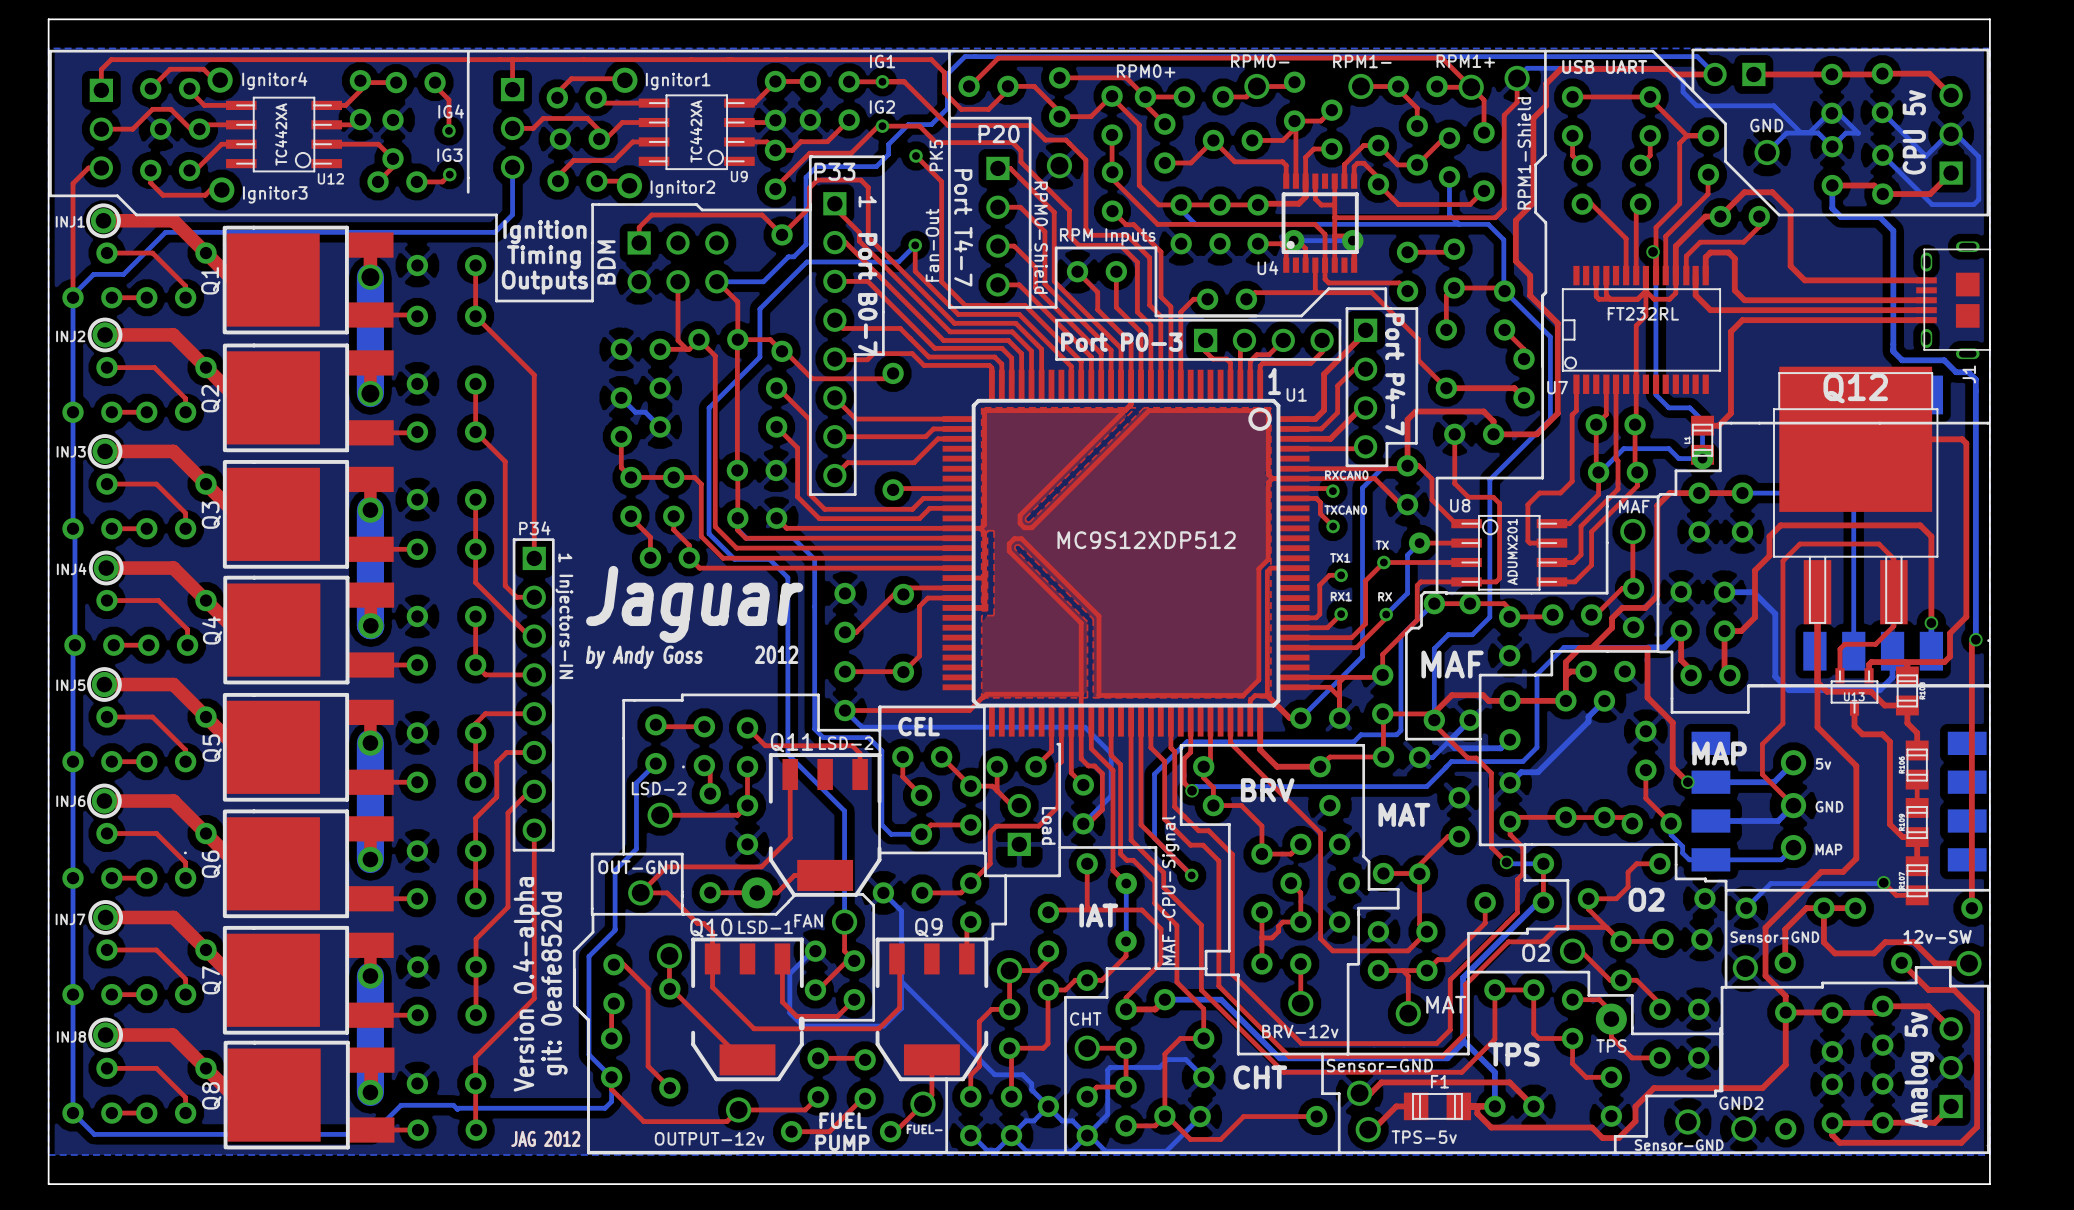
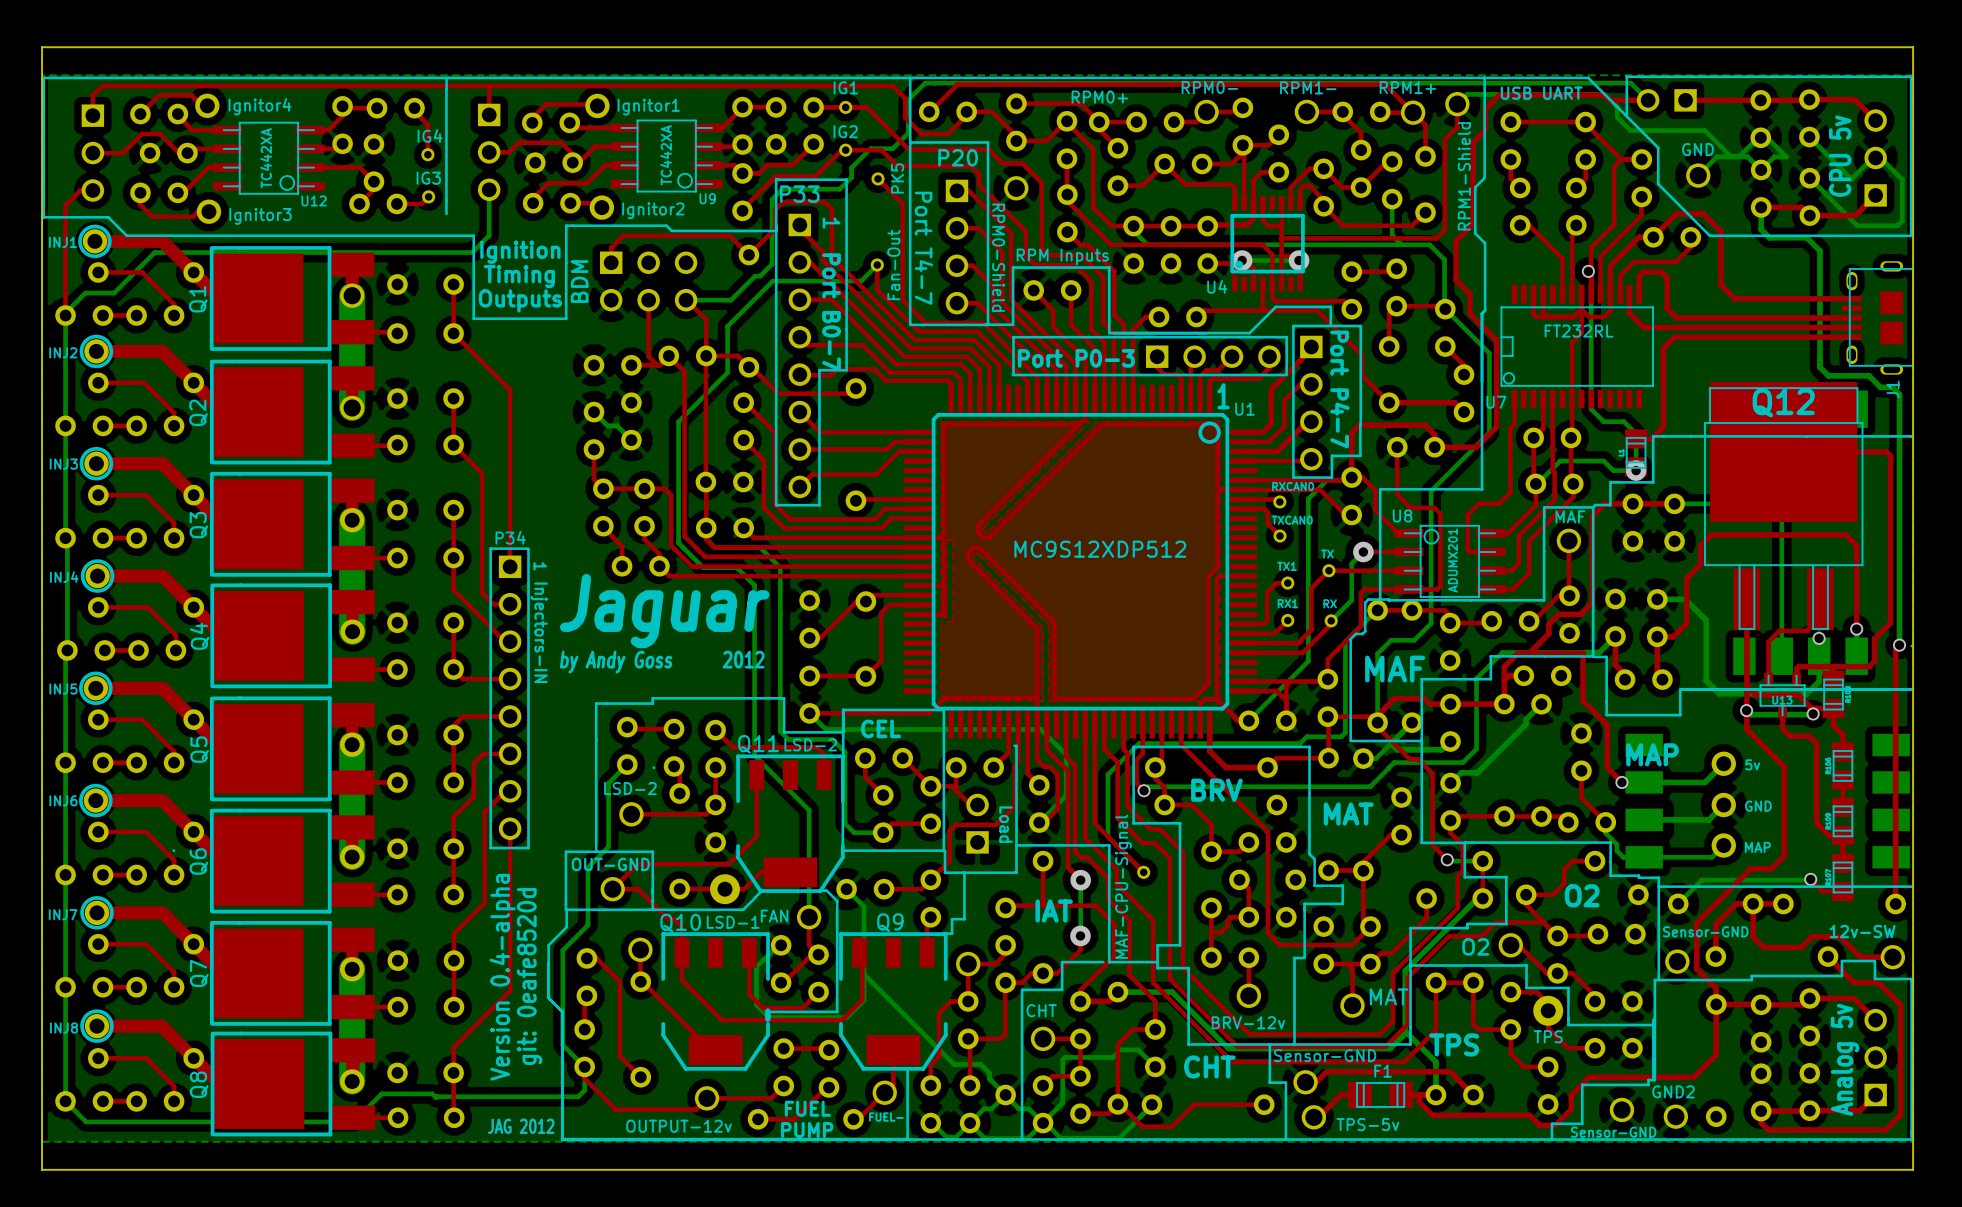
via: none -> (1819, 638)
top track: (1839, 649) (1844, 644) (1875, 644) (1893, 625) (1893, 559) (1878, 544) (1799, 544) (1782, 560) (1782, 723) (1762, 744) (1762, 774) (1793, 805) -> (1768, 654) (1768, 641) (1779, 630) (1806, 630) (1820, 617)
bottom track: none -> (1746, 710) (1750, 714) (1813, 713)
via: none -> (1746, 710)
via: none -> (1813, 713)

